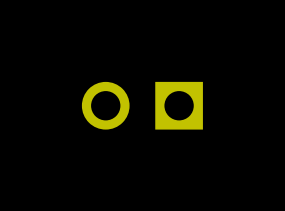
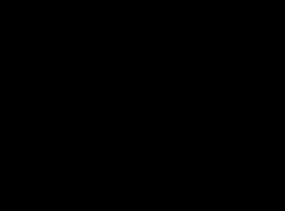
part: (142, 105) -> none

